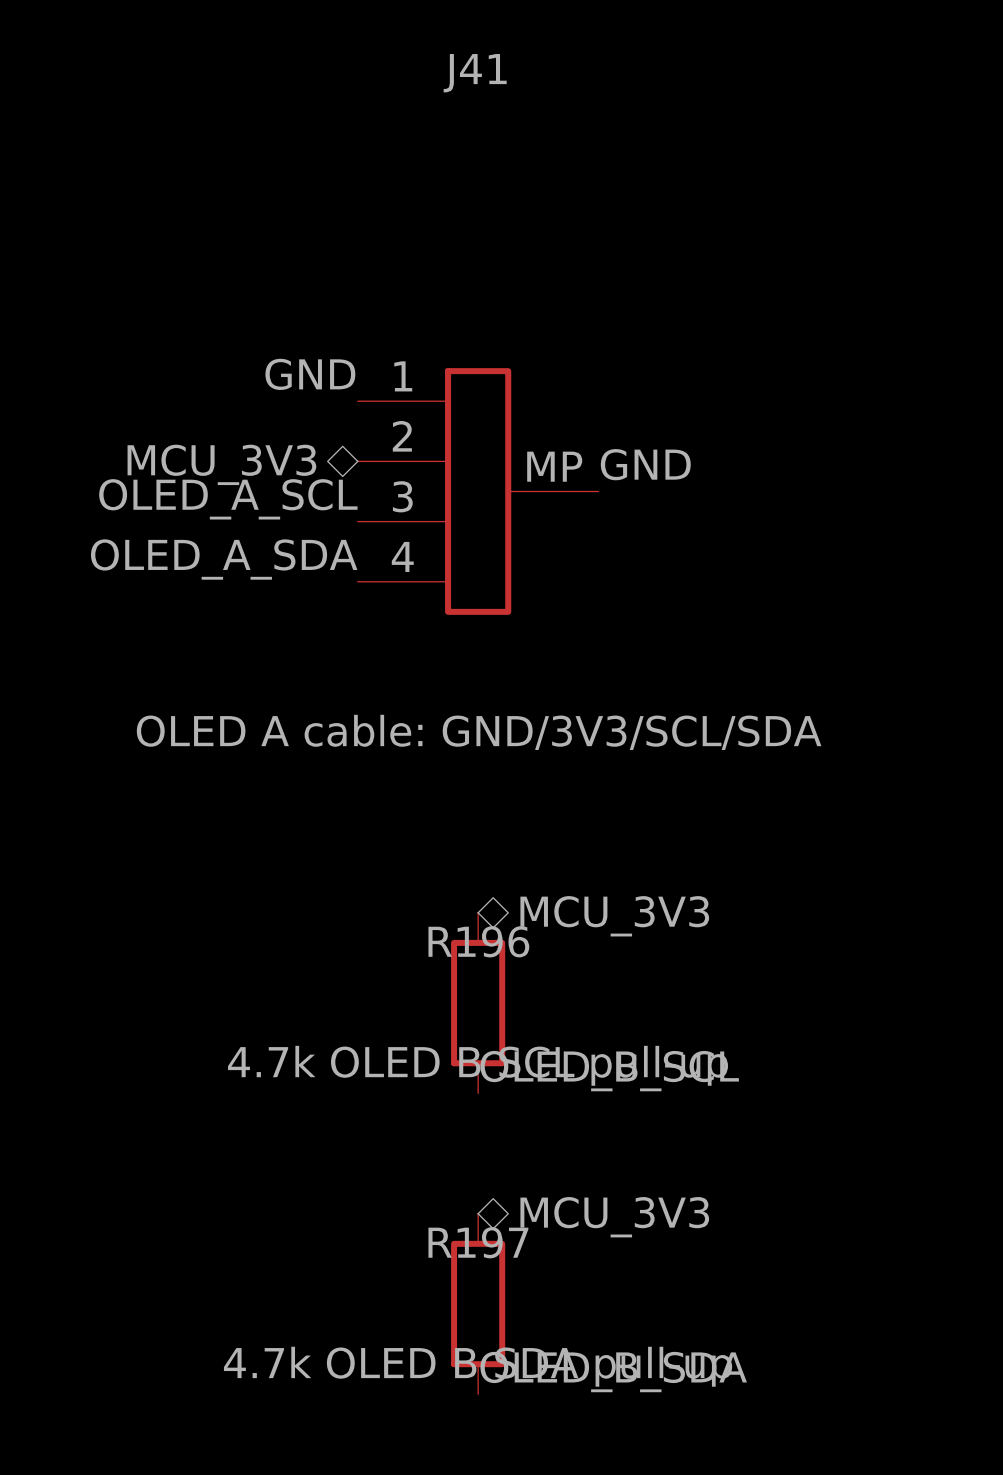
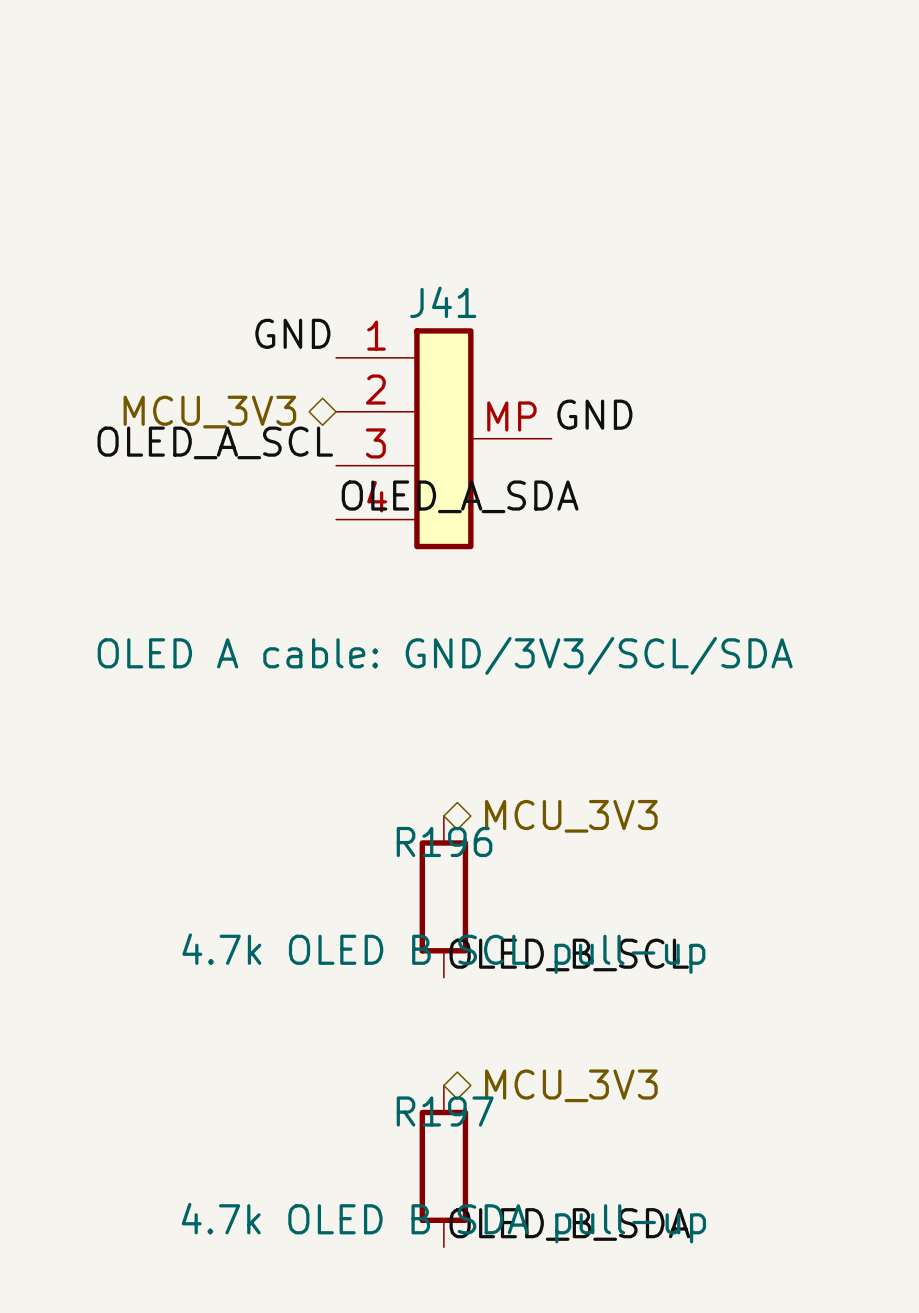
J41 name position: J41 (475, 73) -> J41 (443, 302)
label position: OLED_A_SDA (224, 559) -> OLED_A_SDA (460, 496)

